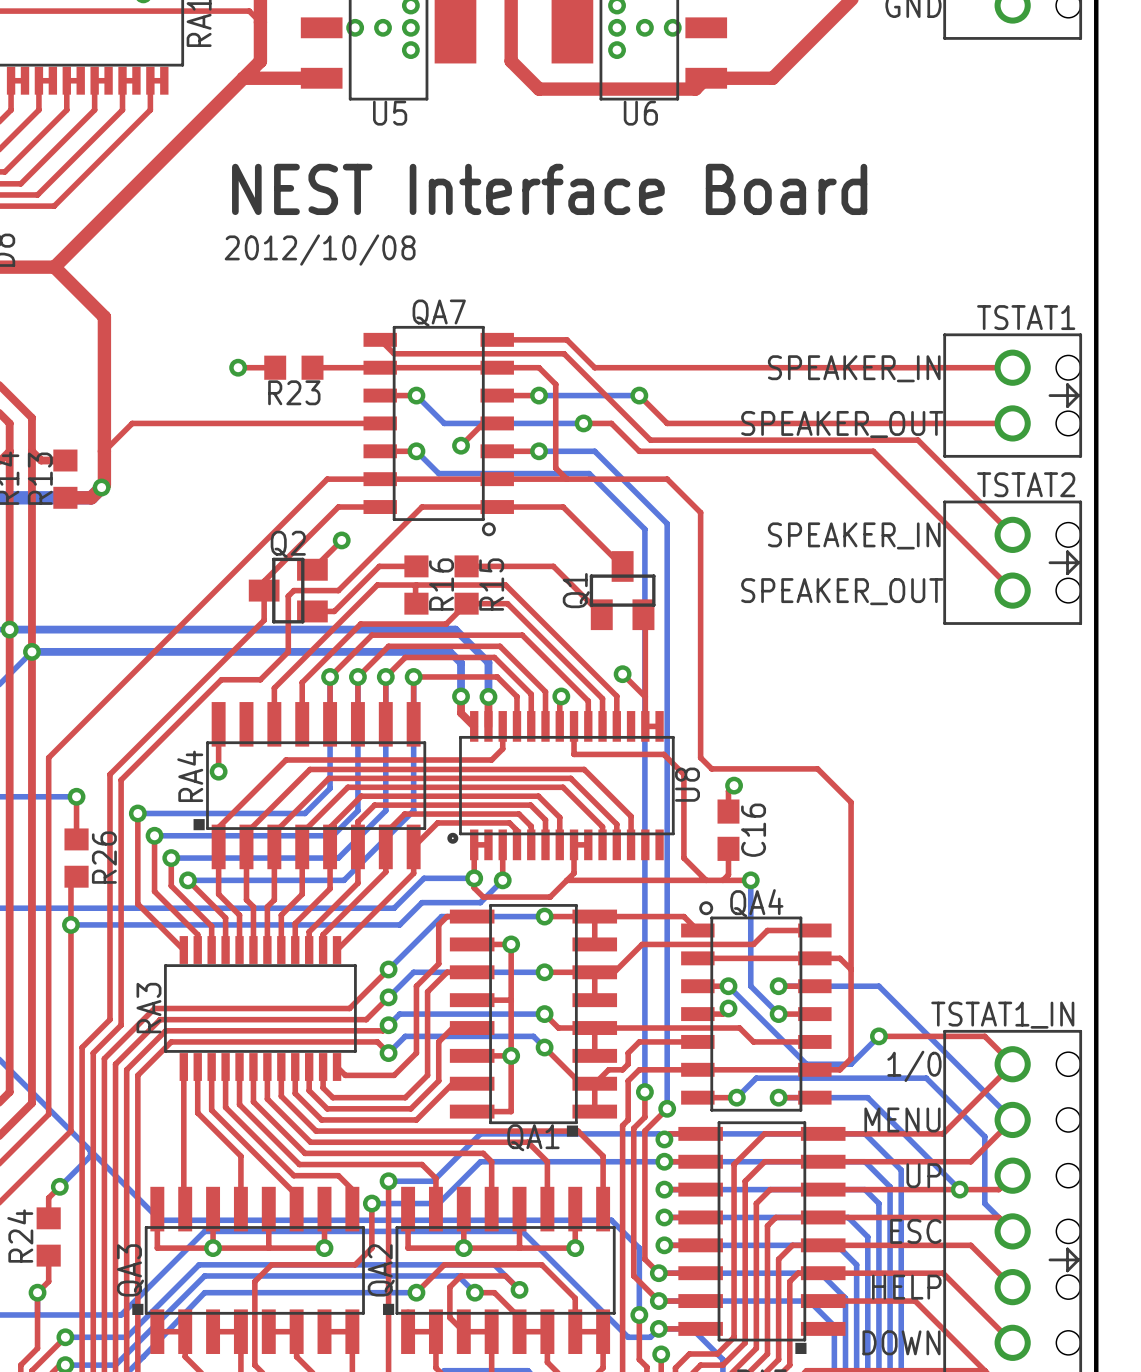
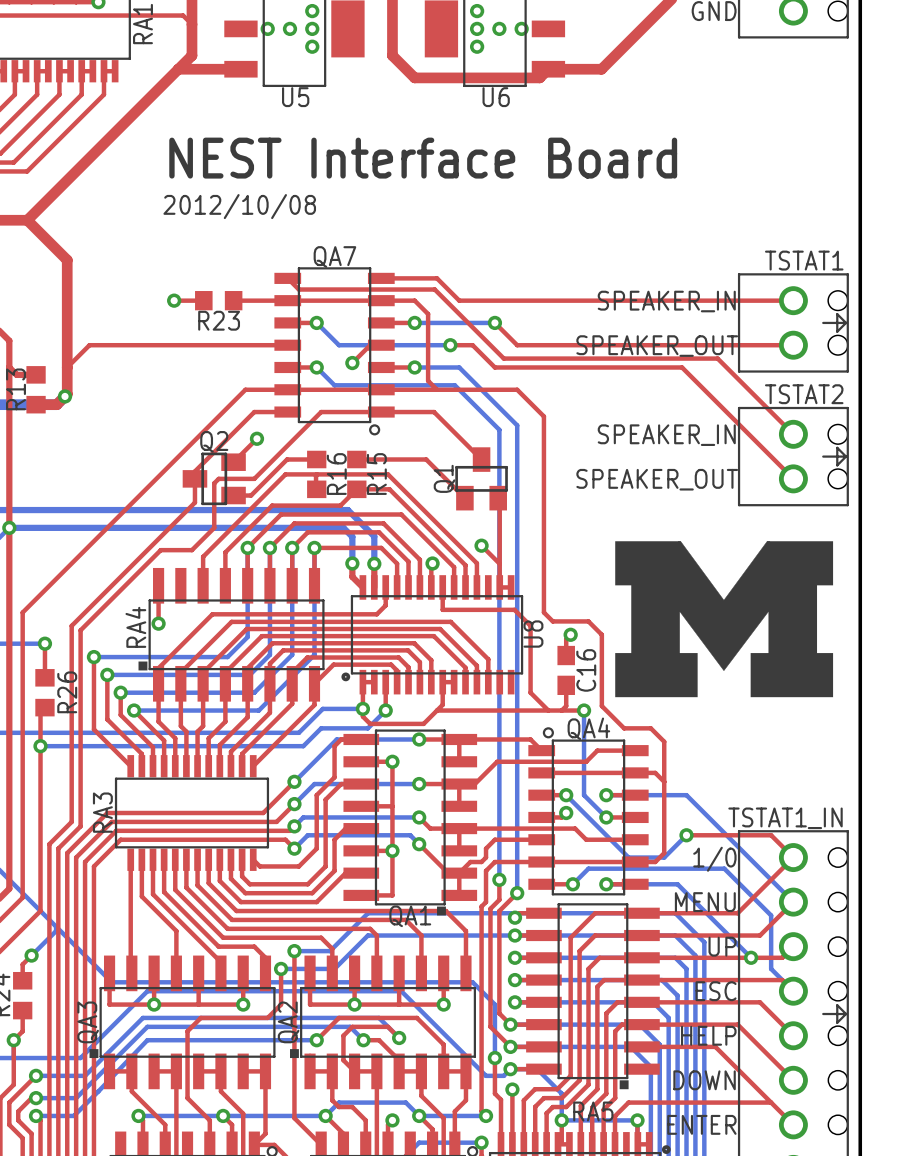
drawing: none -> [615, 541, 834, 698]
top track: (756, 768) (817, 768) (851, 802) (851, 919) -> (588, 621) (601, 634) (601, 706) (624, 728) (650, 728) (664, 741)

